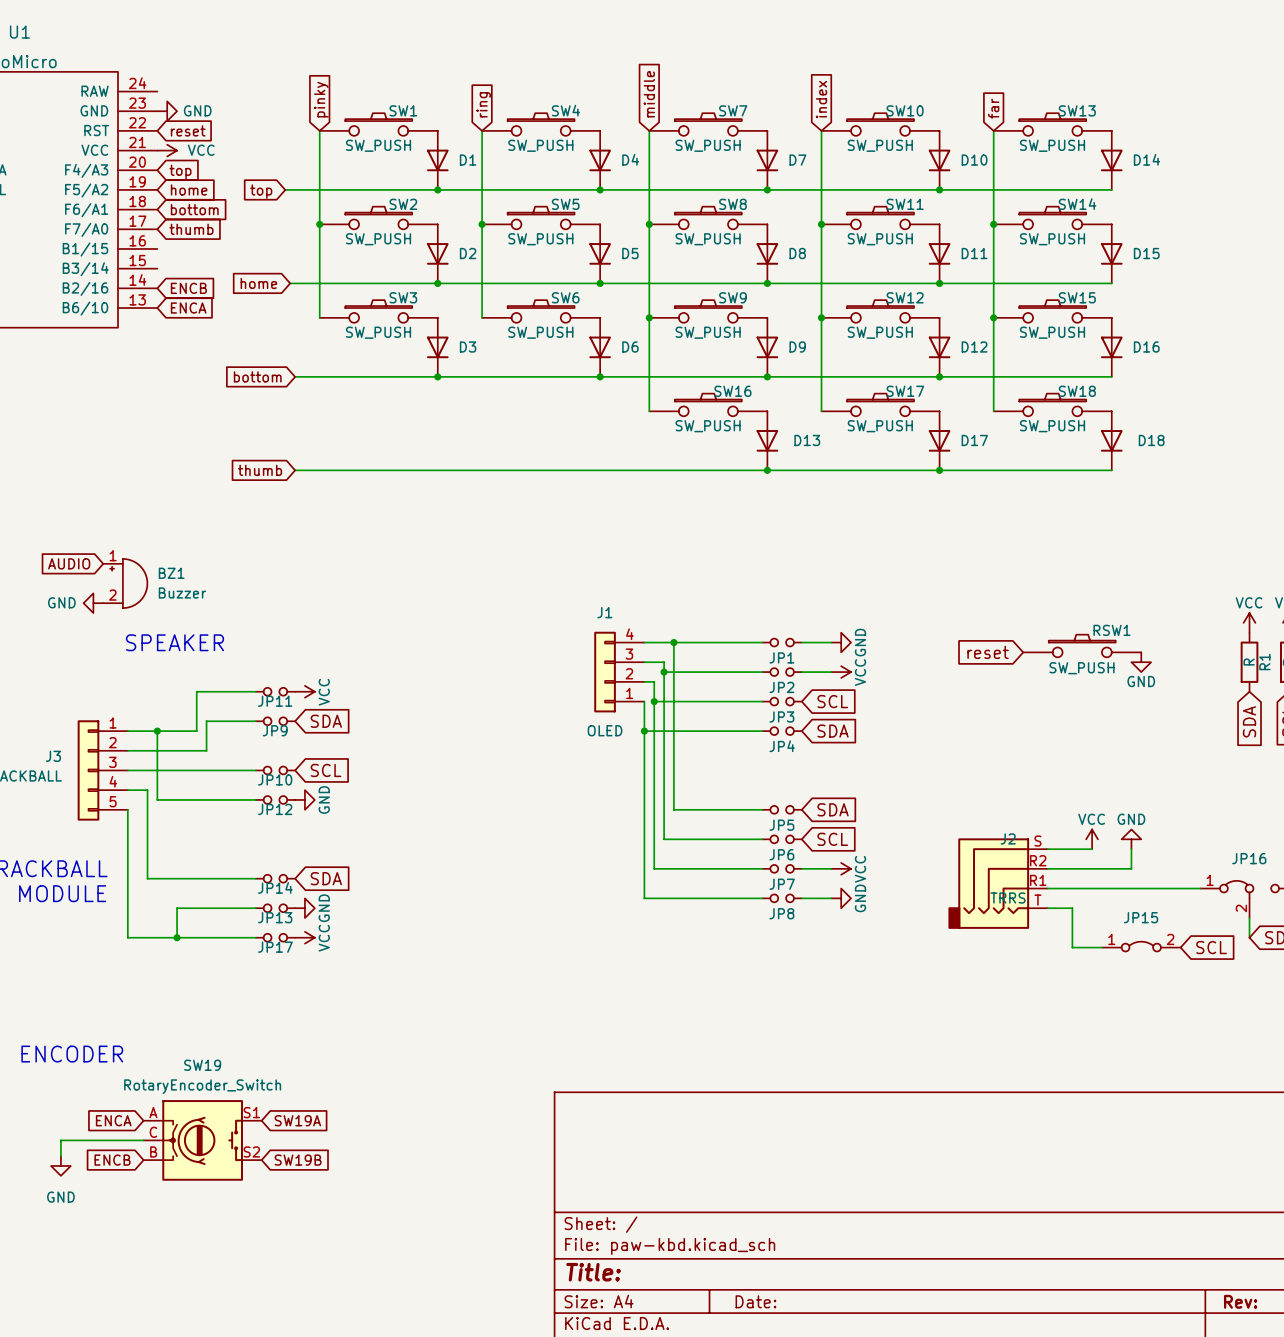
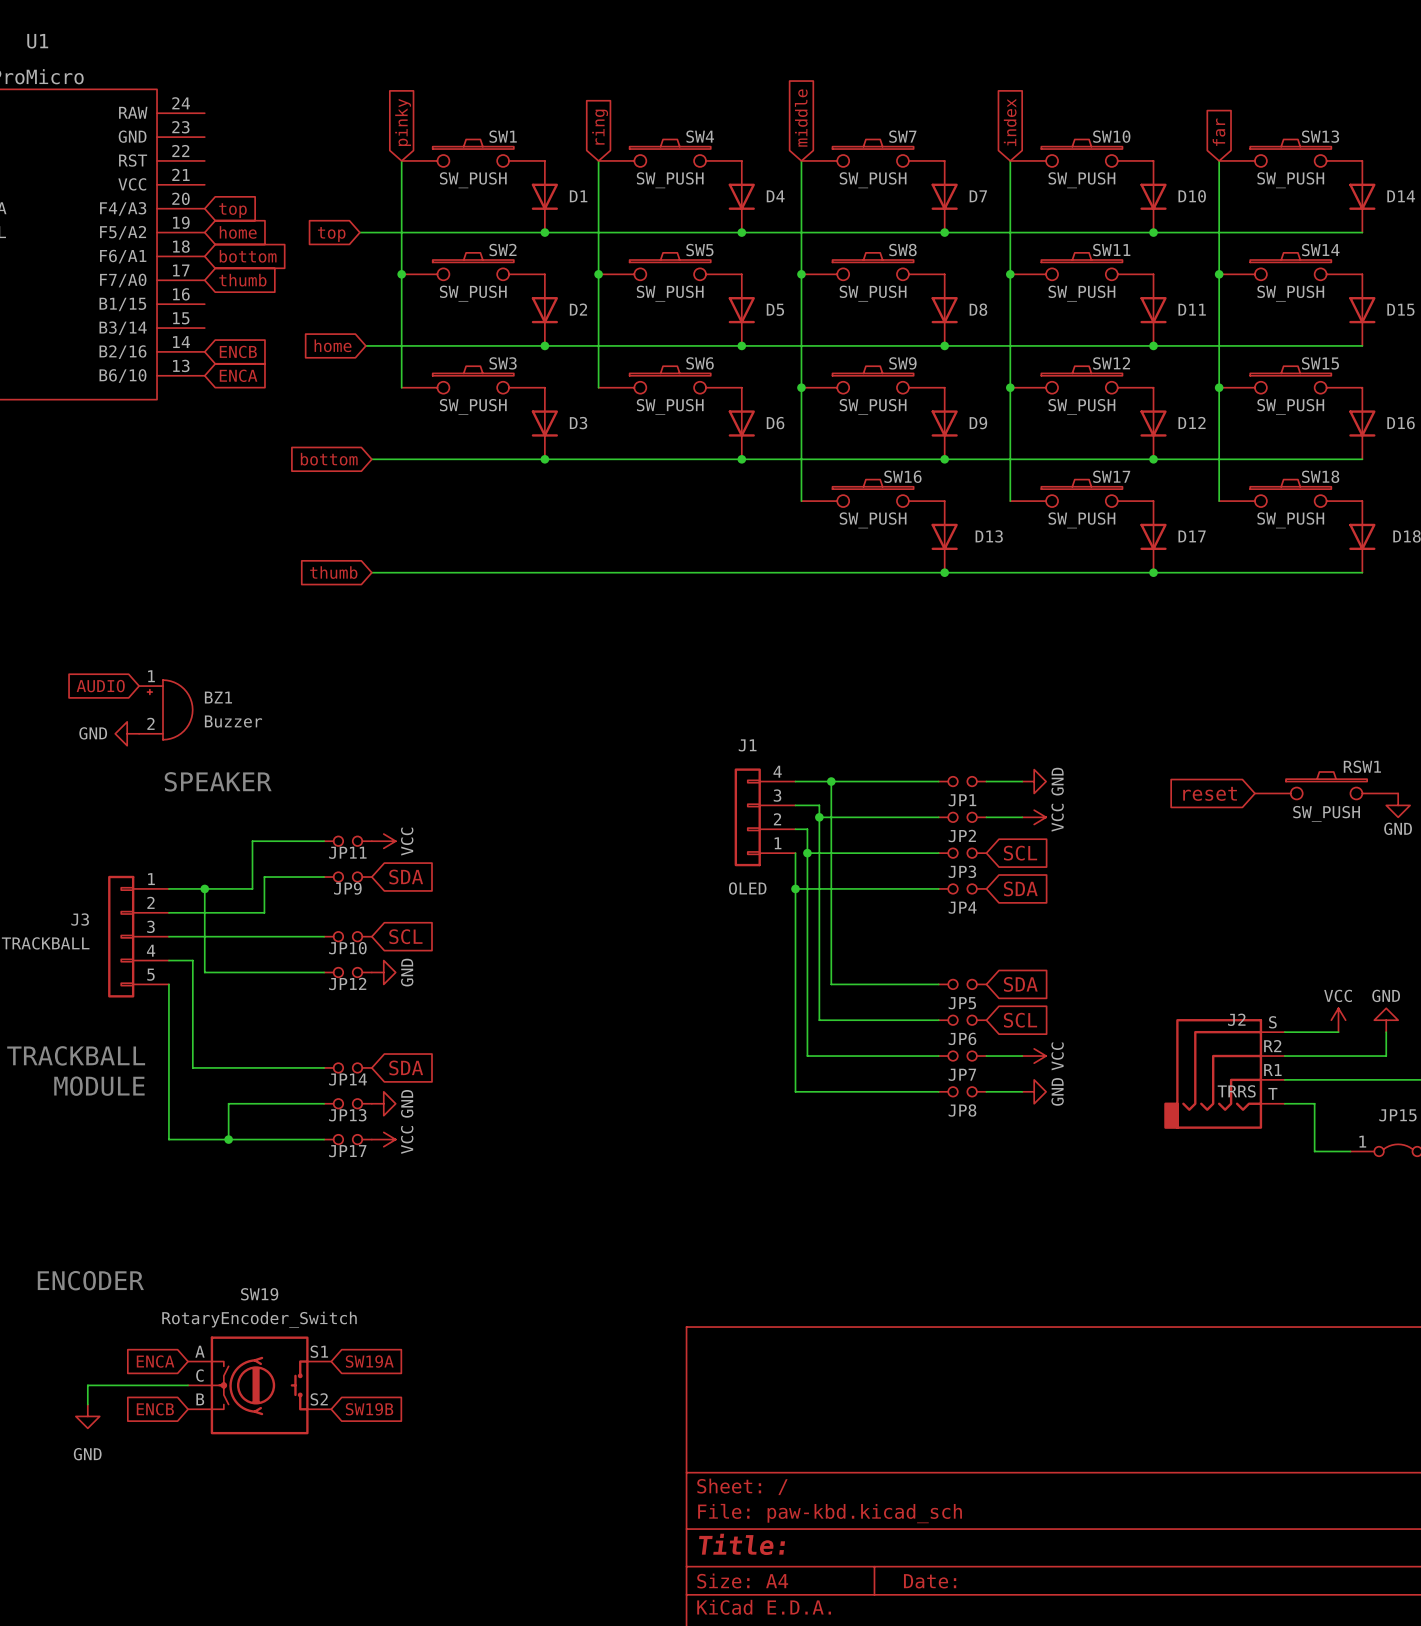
power symbol: GND (167, 111) -> none
global label: reset (188, 130) -> none
power symbol: VCC (167, 150) -> none

